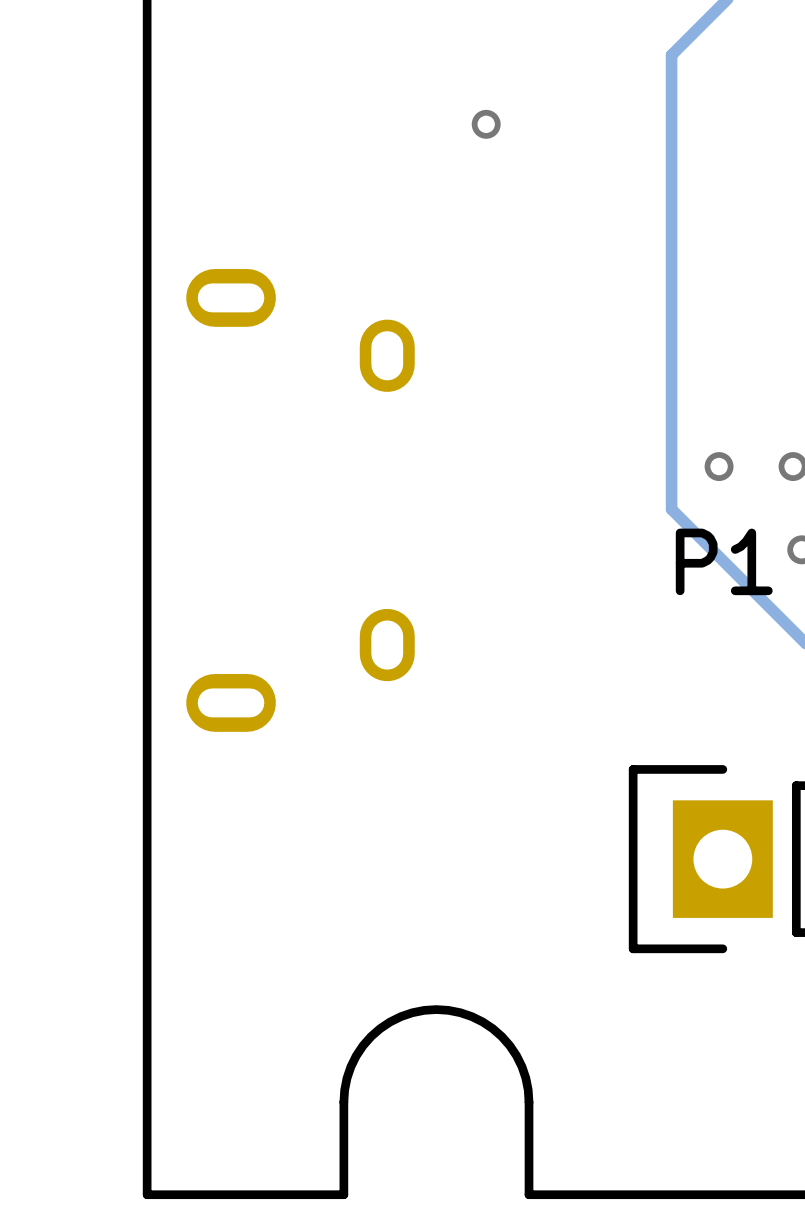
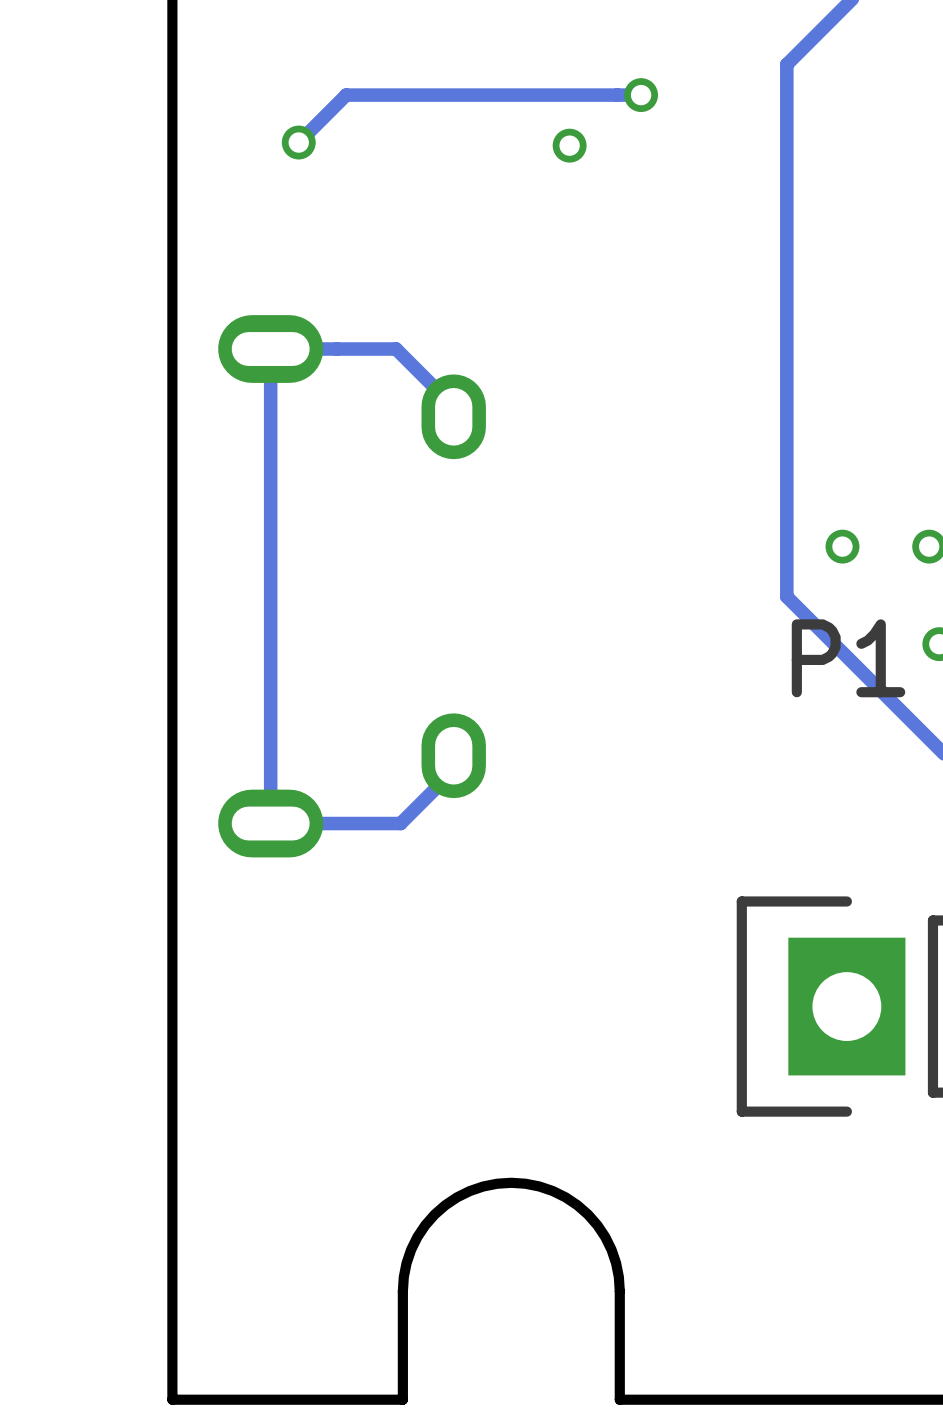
track: none -> (641, 95) (346, 95) (298, 142)
via: none -> (641, 95)
via: none -> (298, 142)
track: none -> (453, 416) (453, 406) (396, 349) (270, 349) (270, 823) (400, 823) (453, 770) (453, 755)

